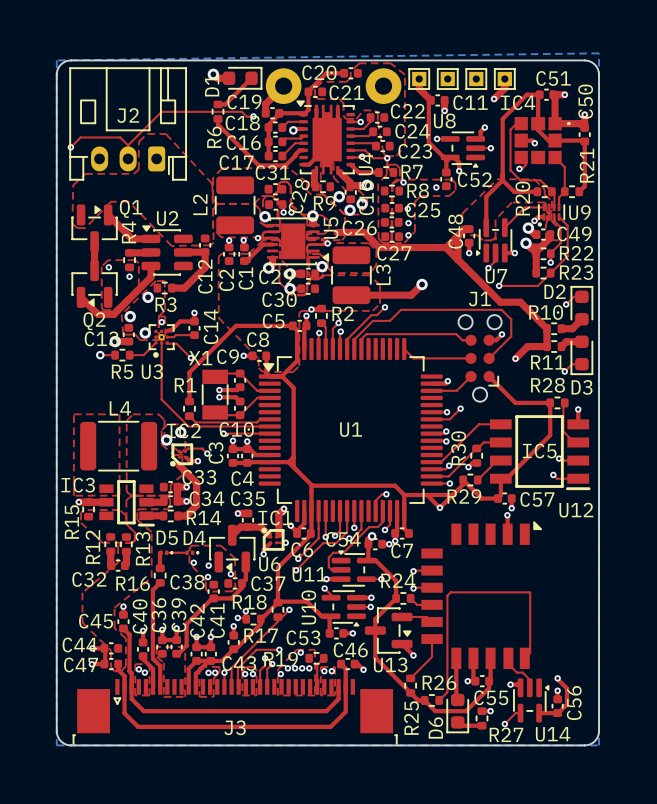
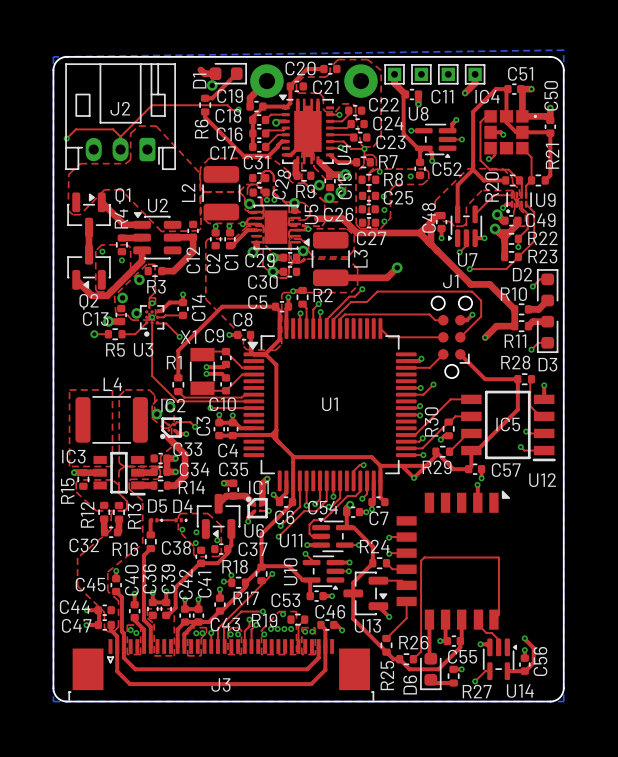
via position: (213, 74) -> (212, 85)

